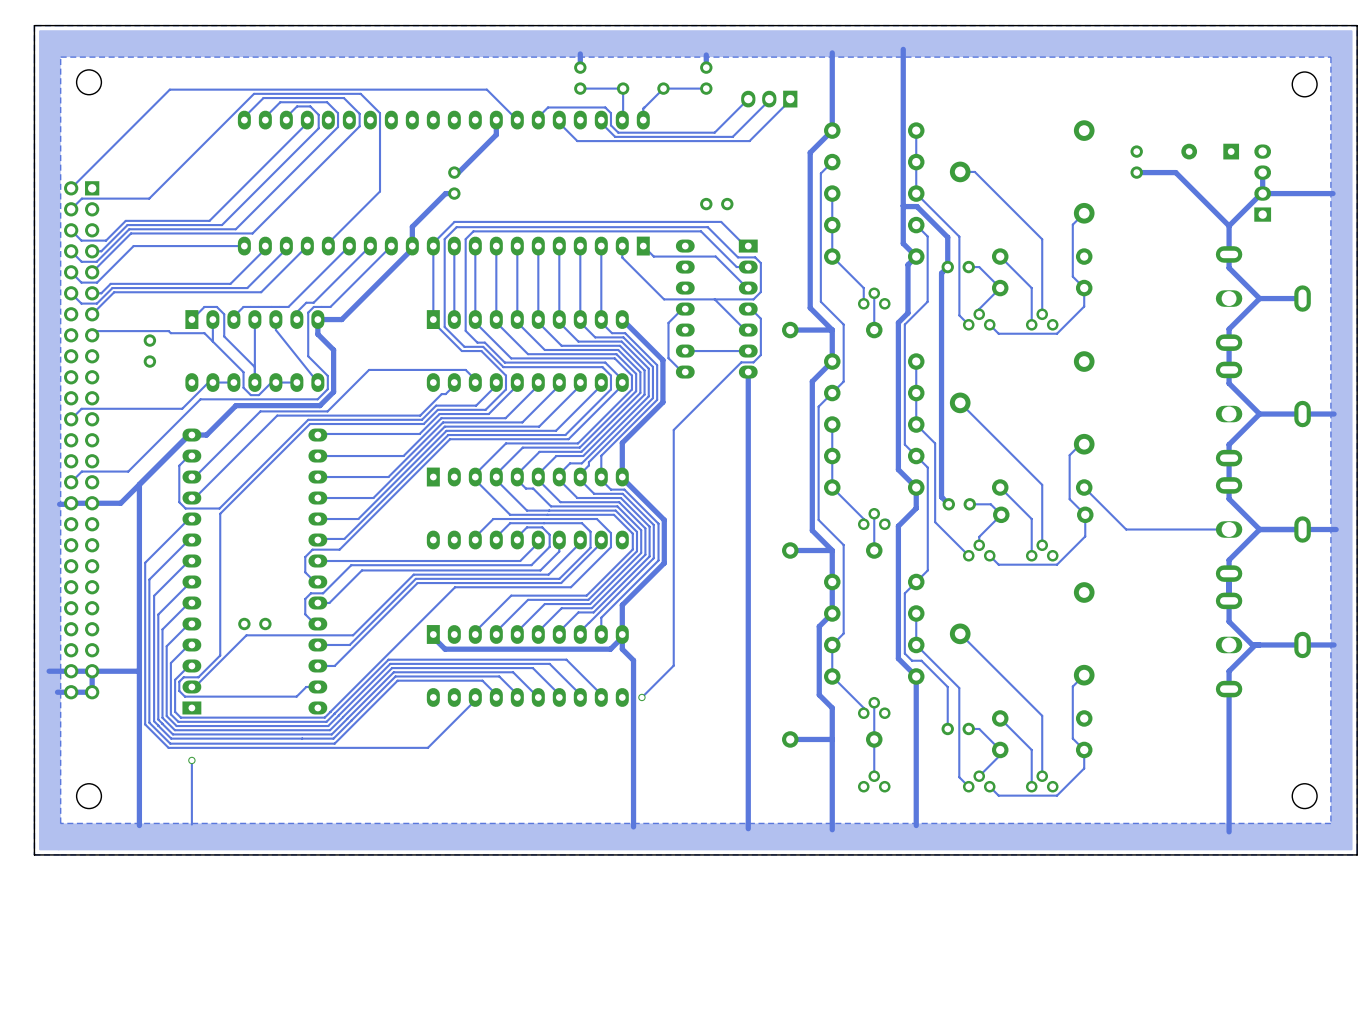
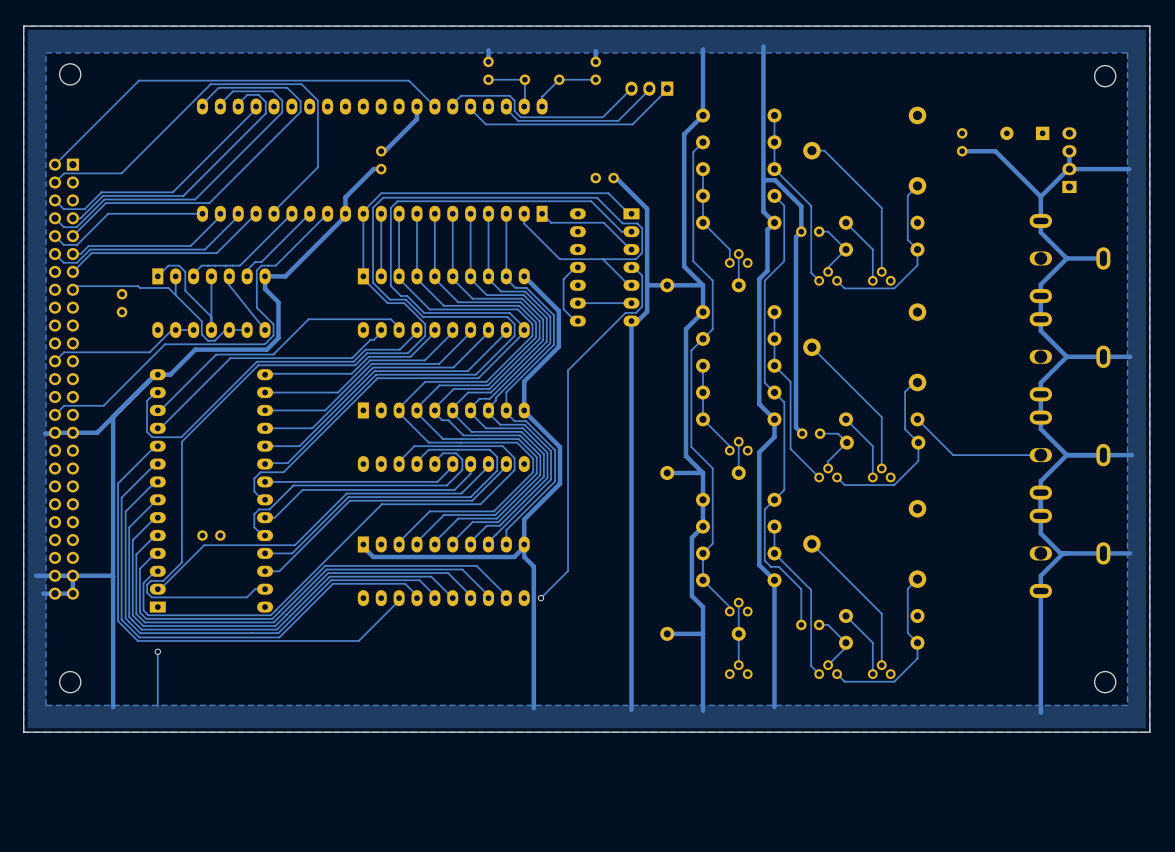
track: none -> (613, 178) (616, 178) (647, 208) (647, 311) (637, 321) (631, 321)
track: none -> (647, 284) (667, 285)

